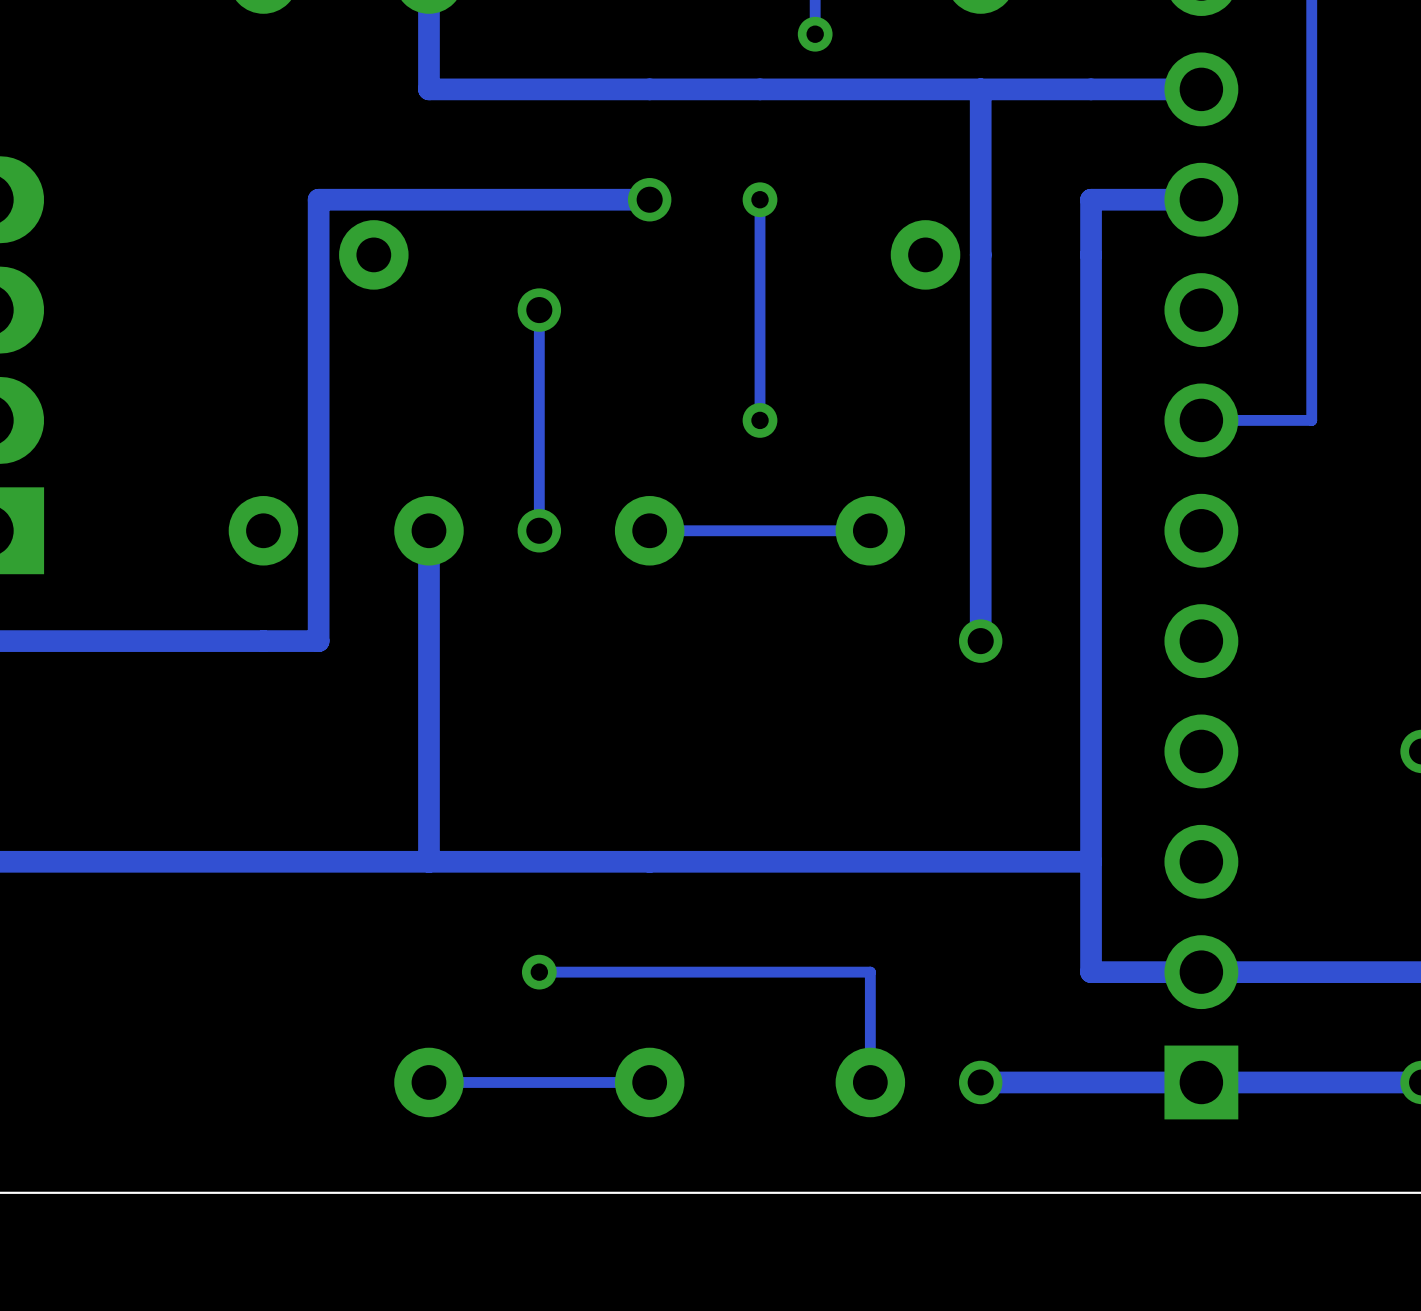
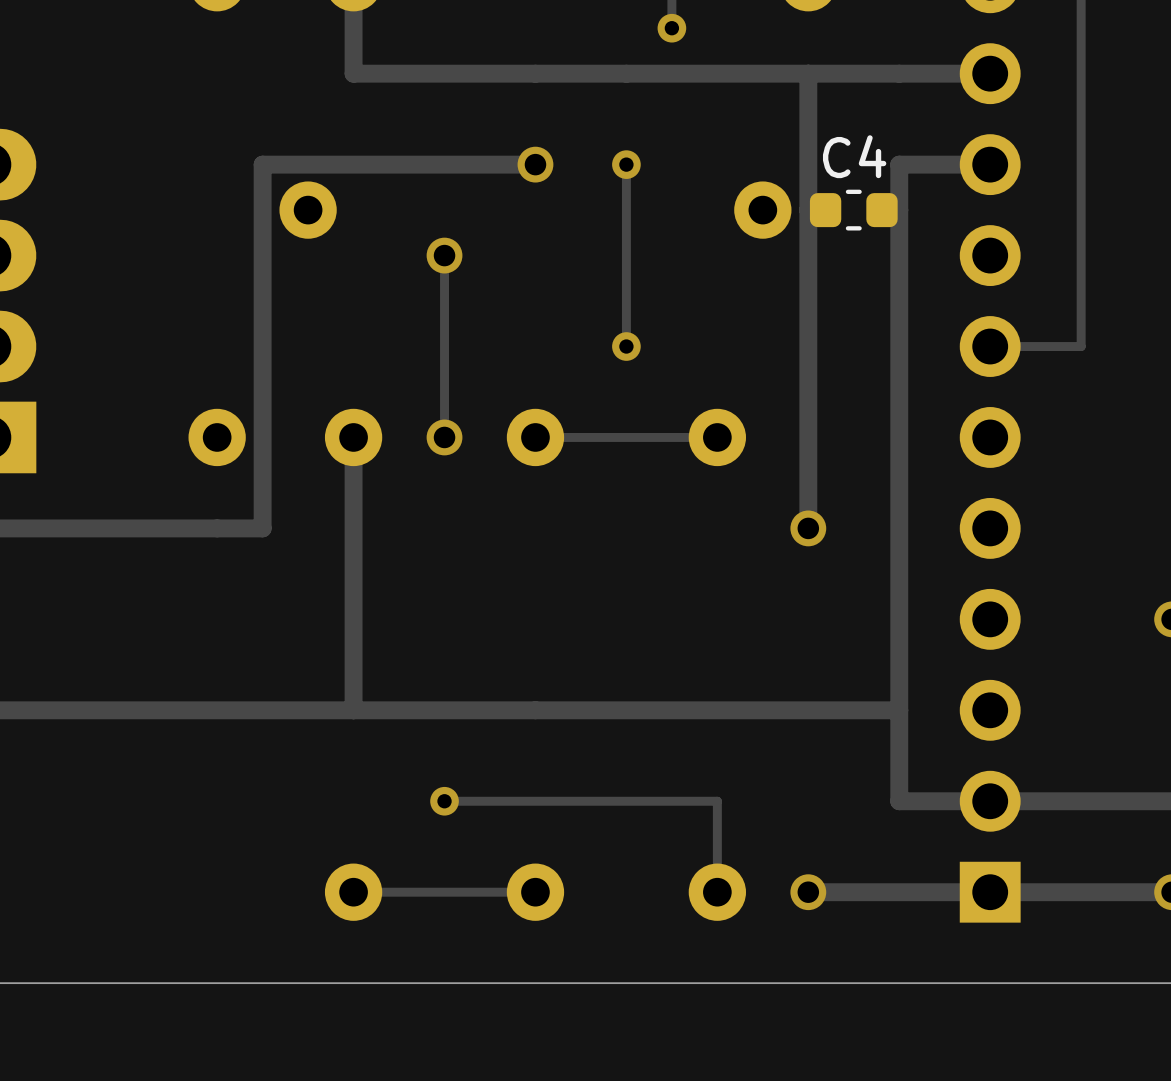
C4: none -> (853, 210)

